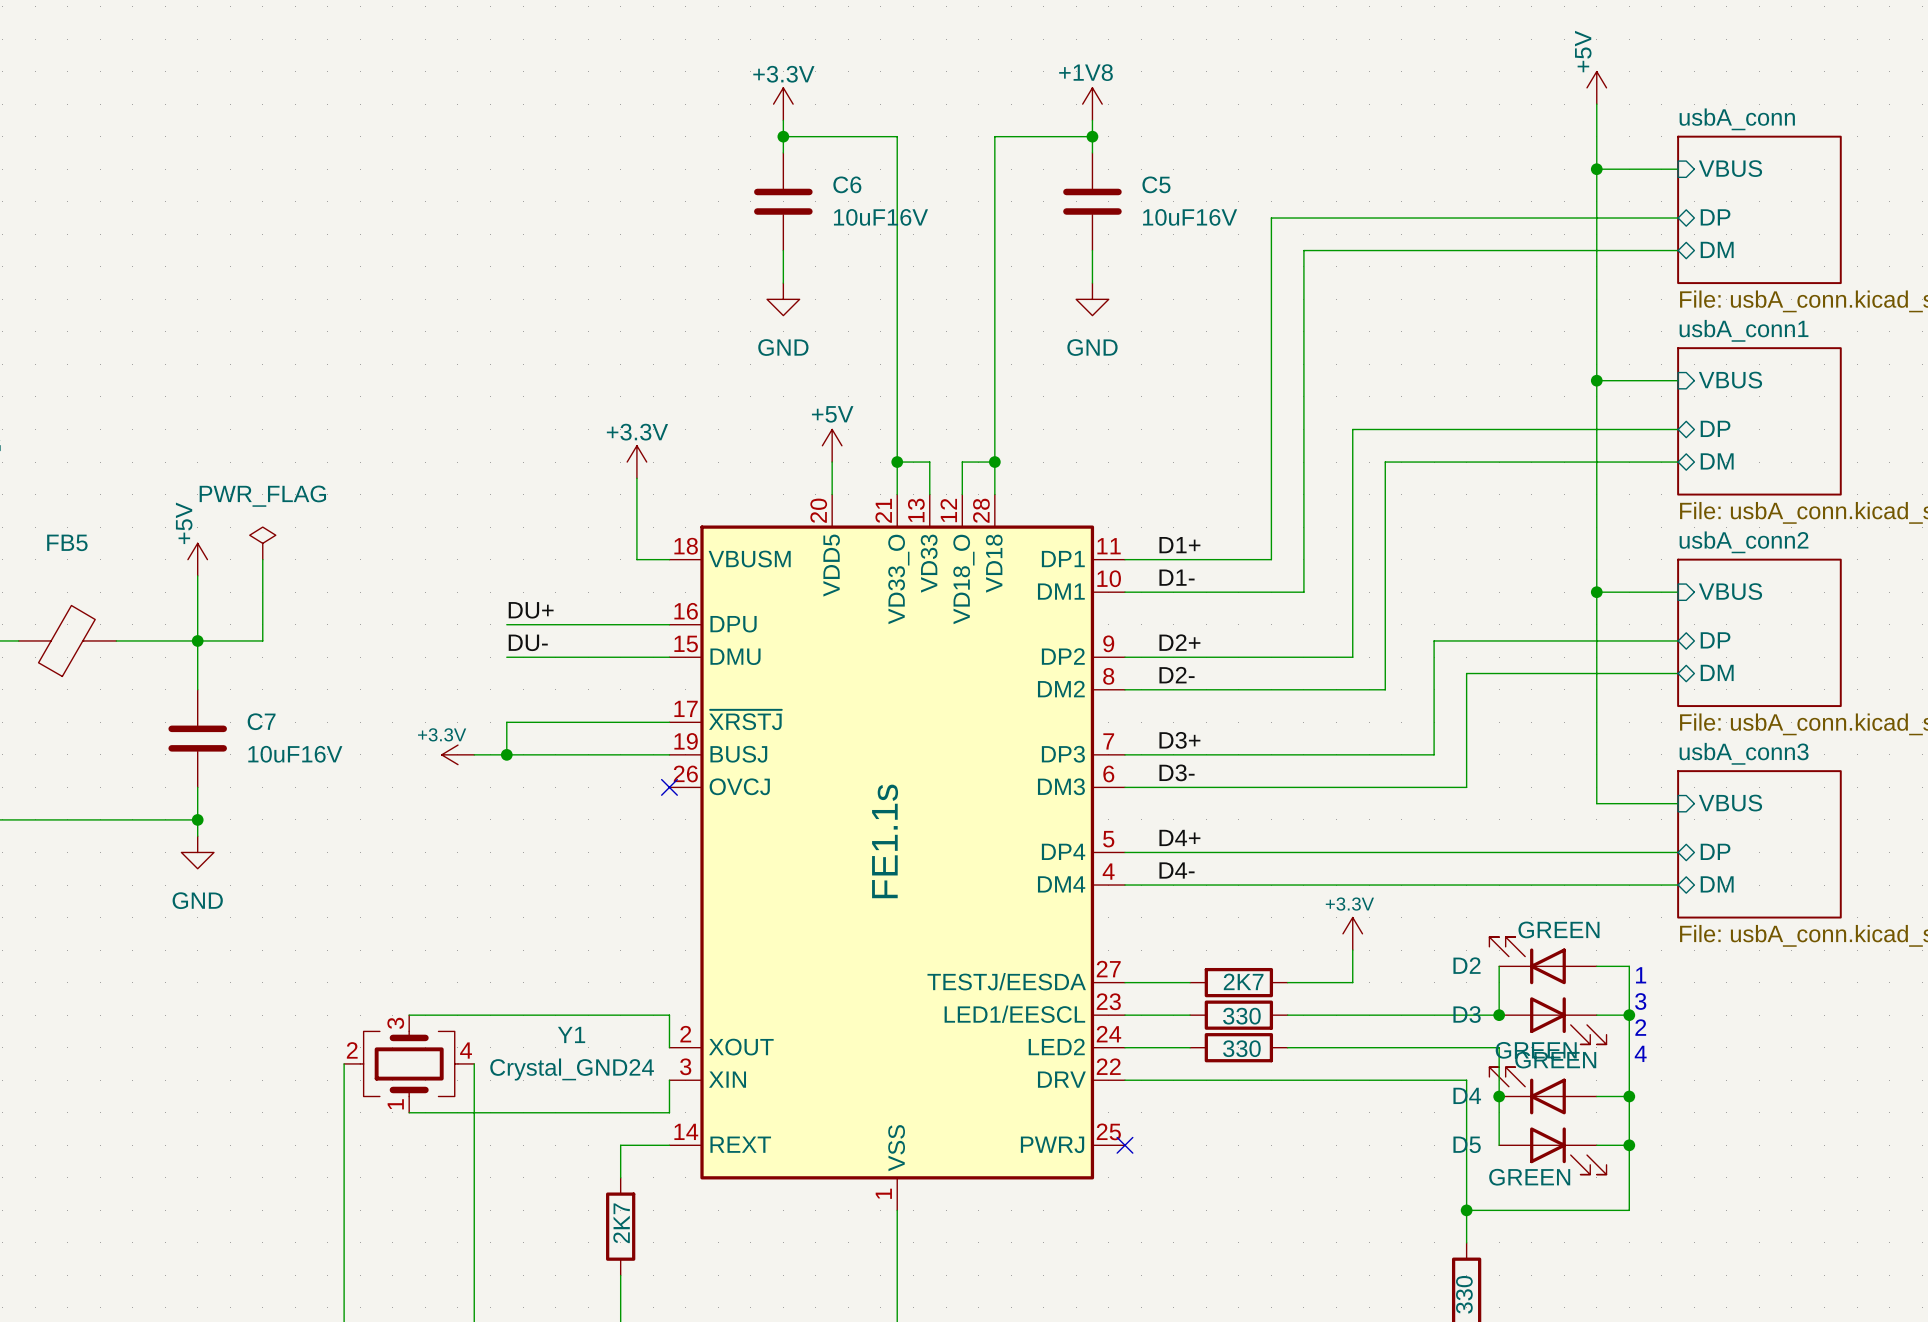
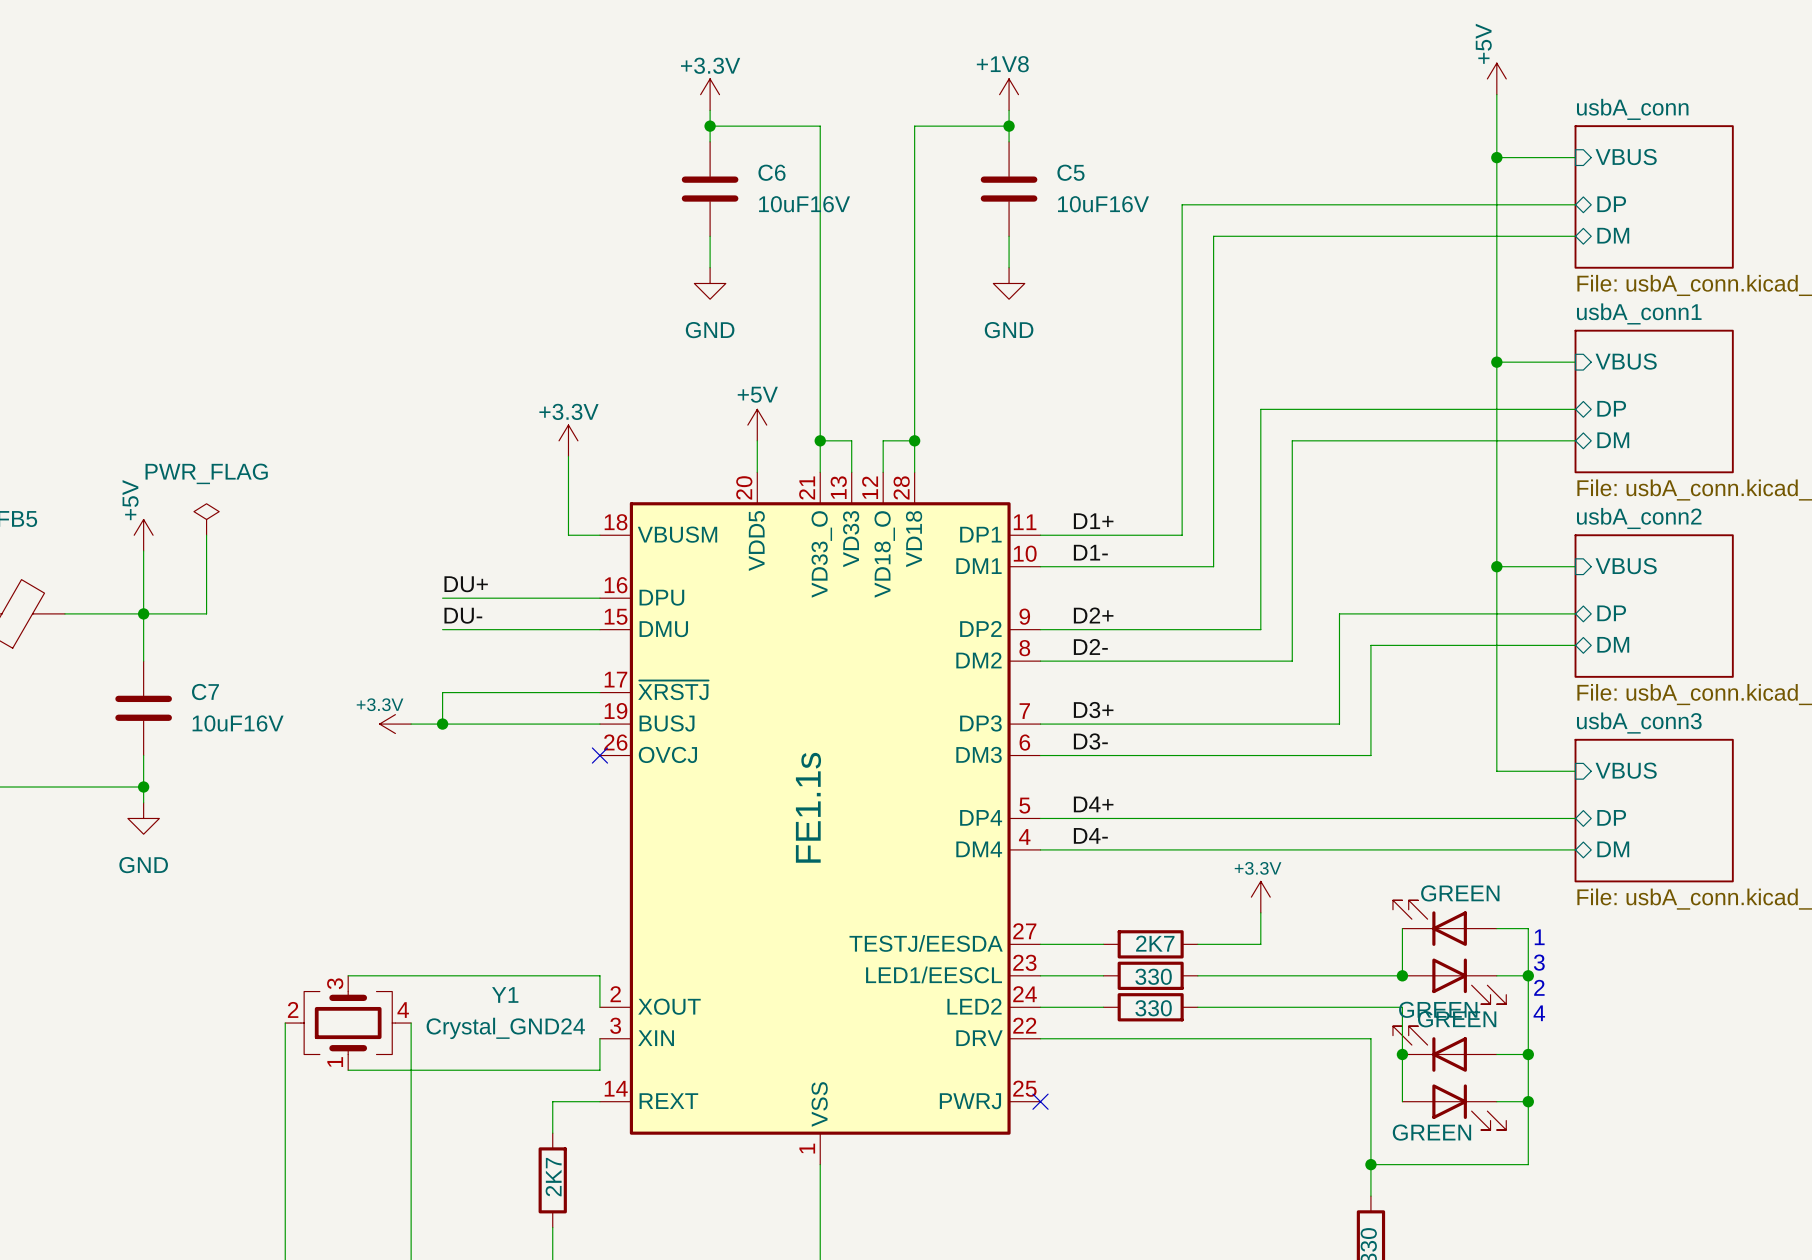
D2 name: D2 (1466, 965) -> none
D3 name: D3 (1467, 1014) -> none
D4 name: D4 (1467, 1095) -> none
D5 name: D5 (1467, 1144) -> none

